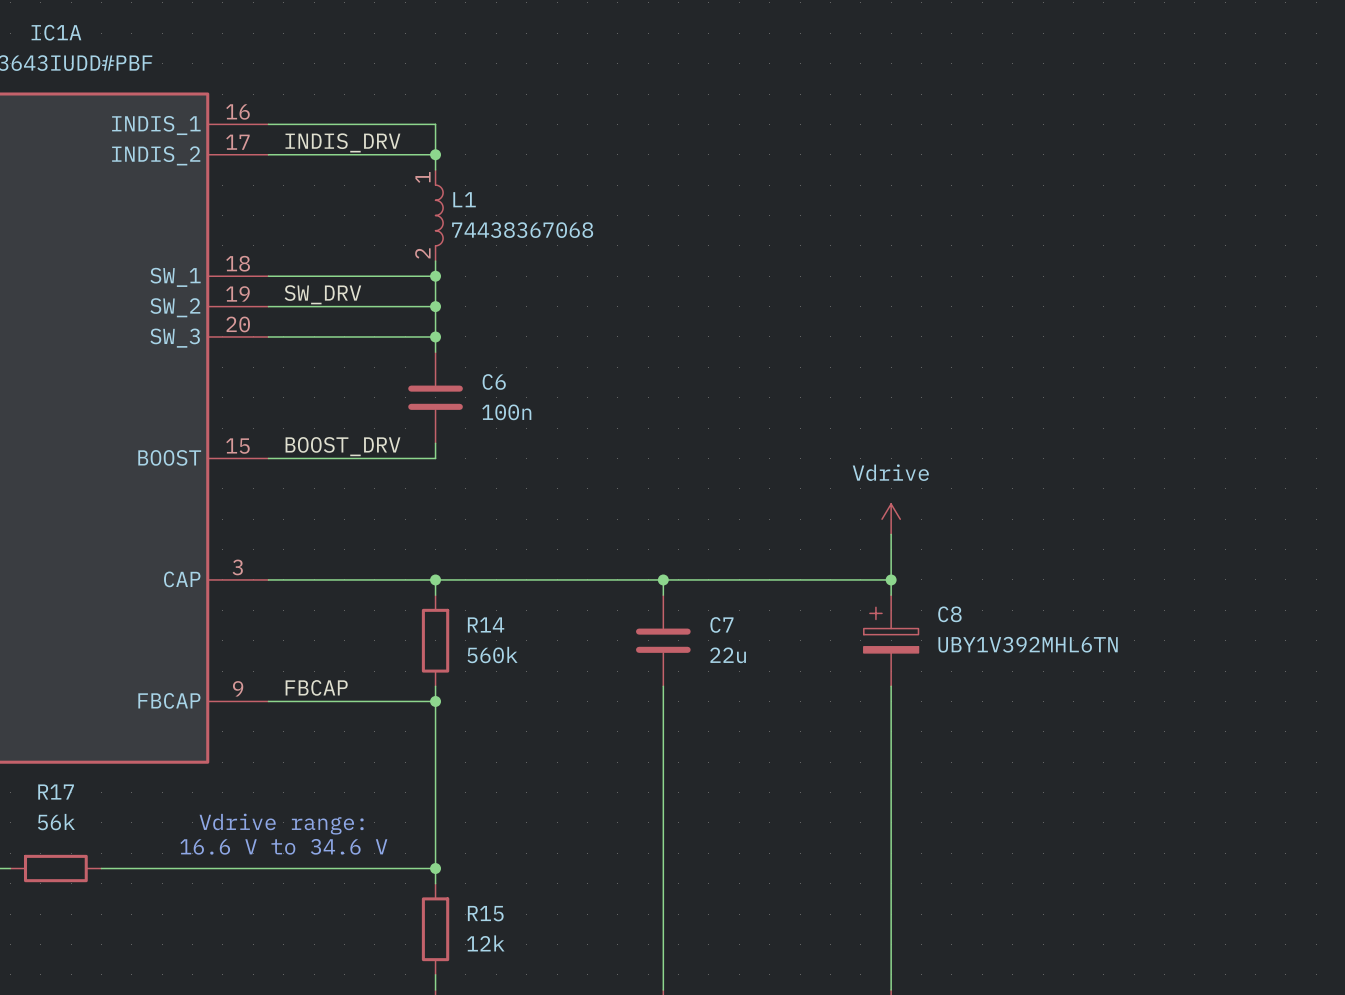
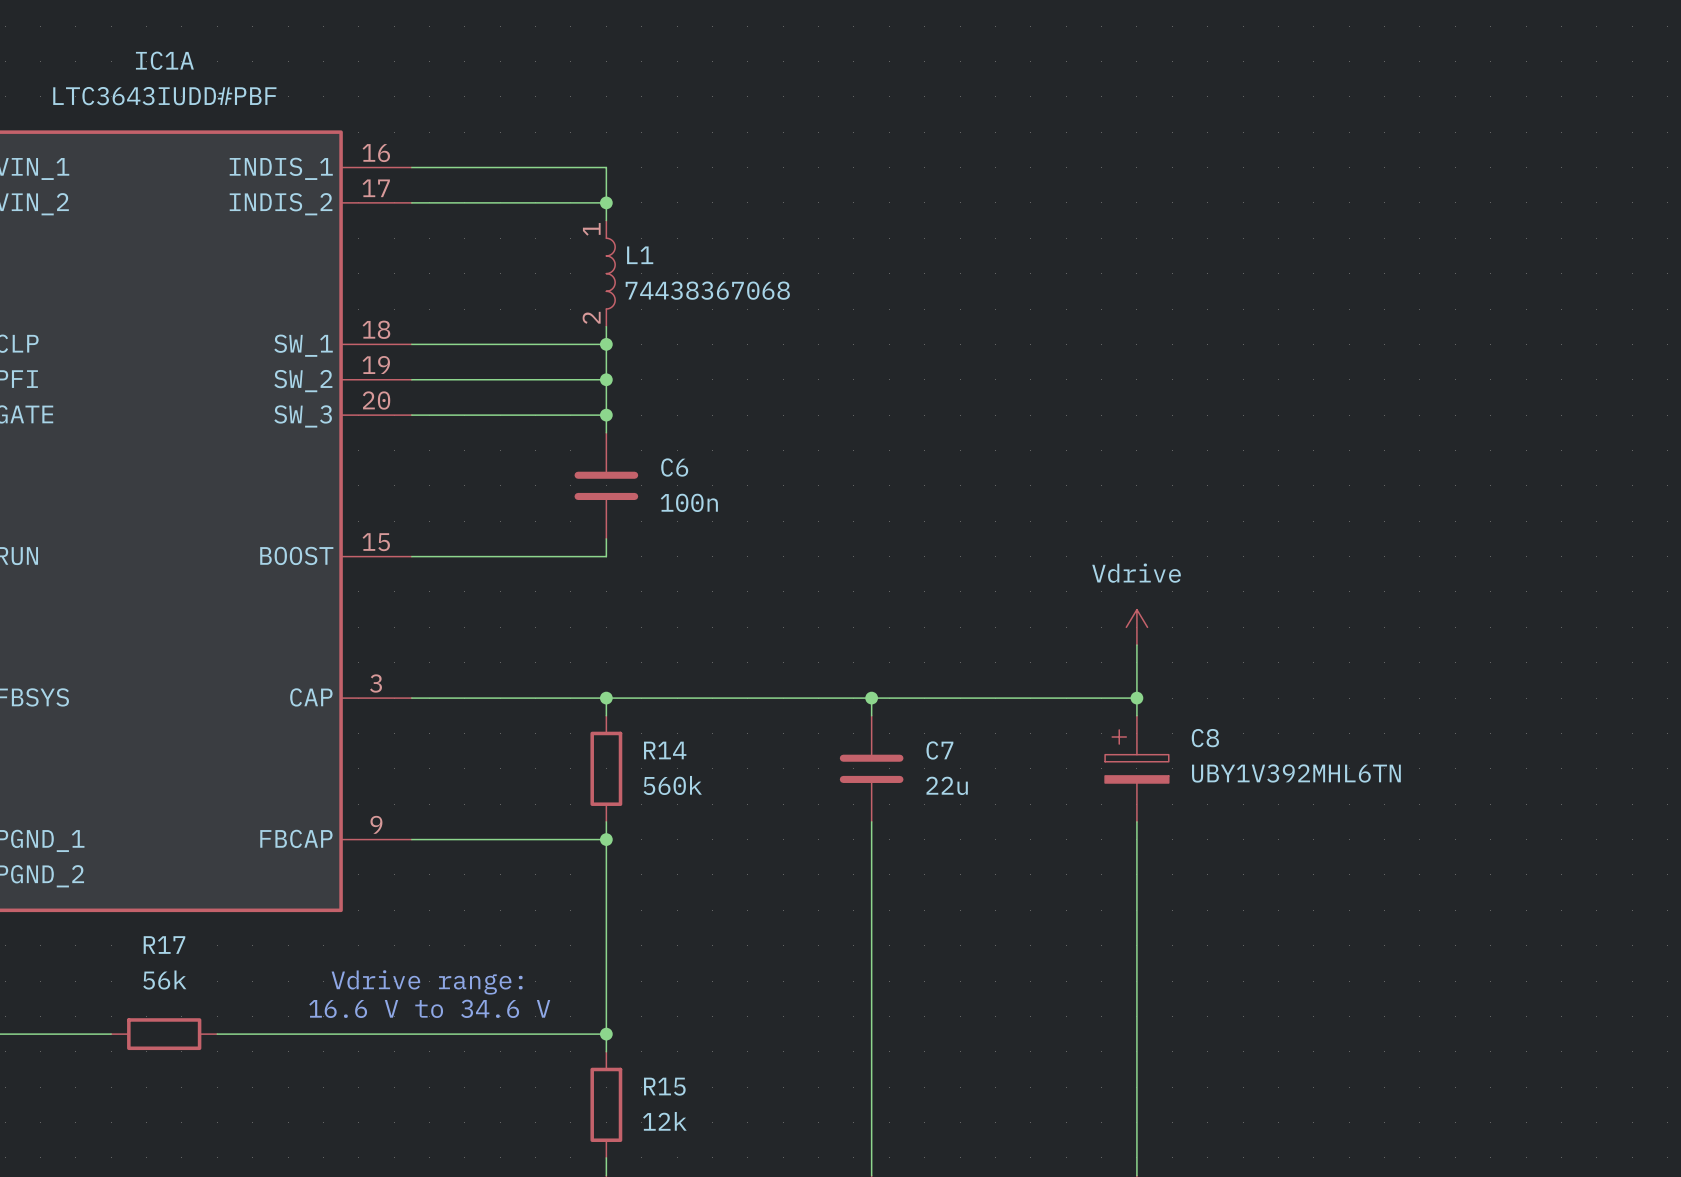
label: INDIS_DRV (342, 142) -> none
label: SW_DRV (322, 294) -> none
label: BOOST_DRV (342, 446) -> none
label: FBCAP (316, 687) -> none

